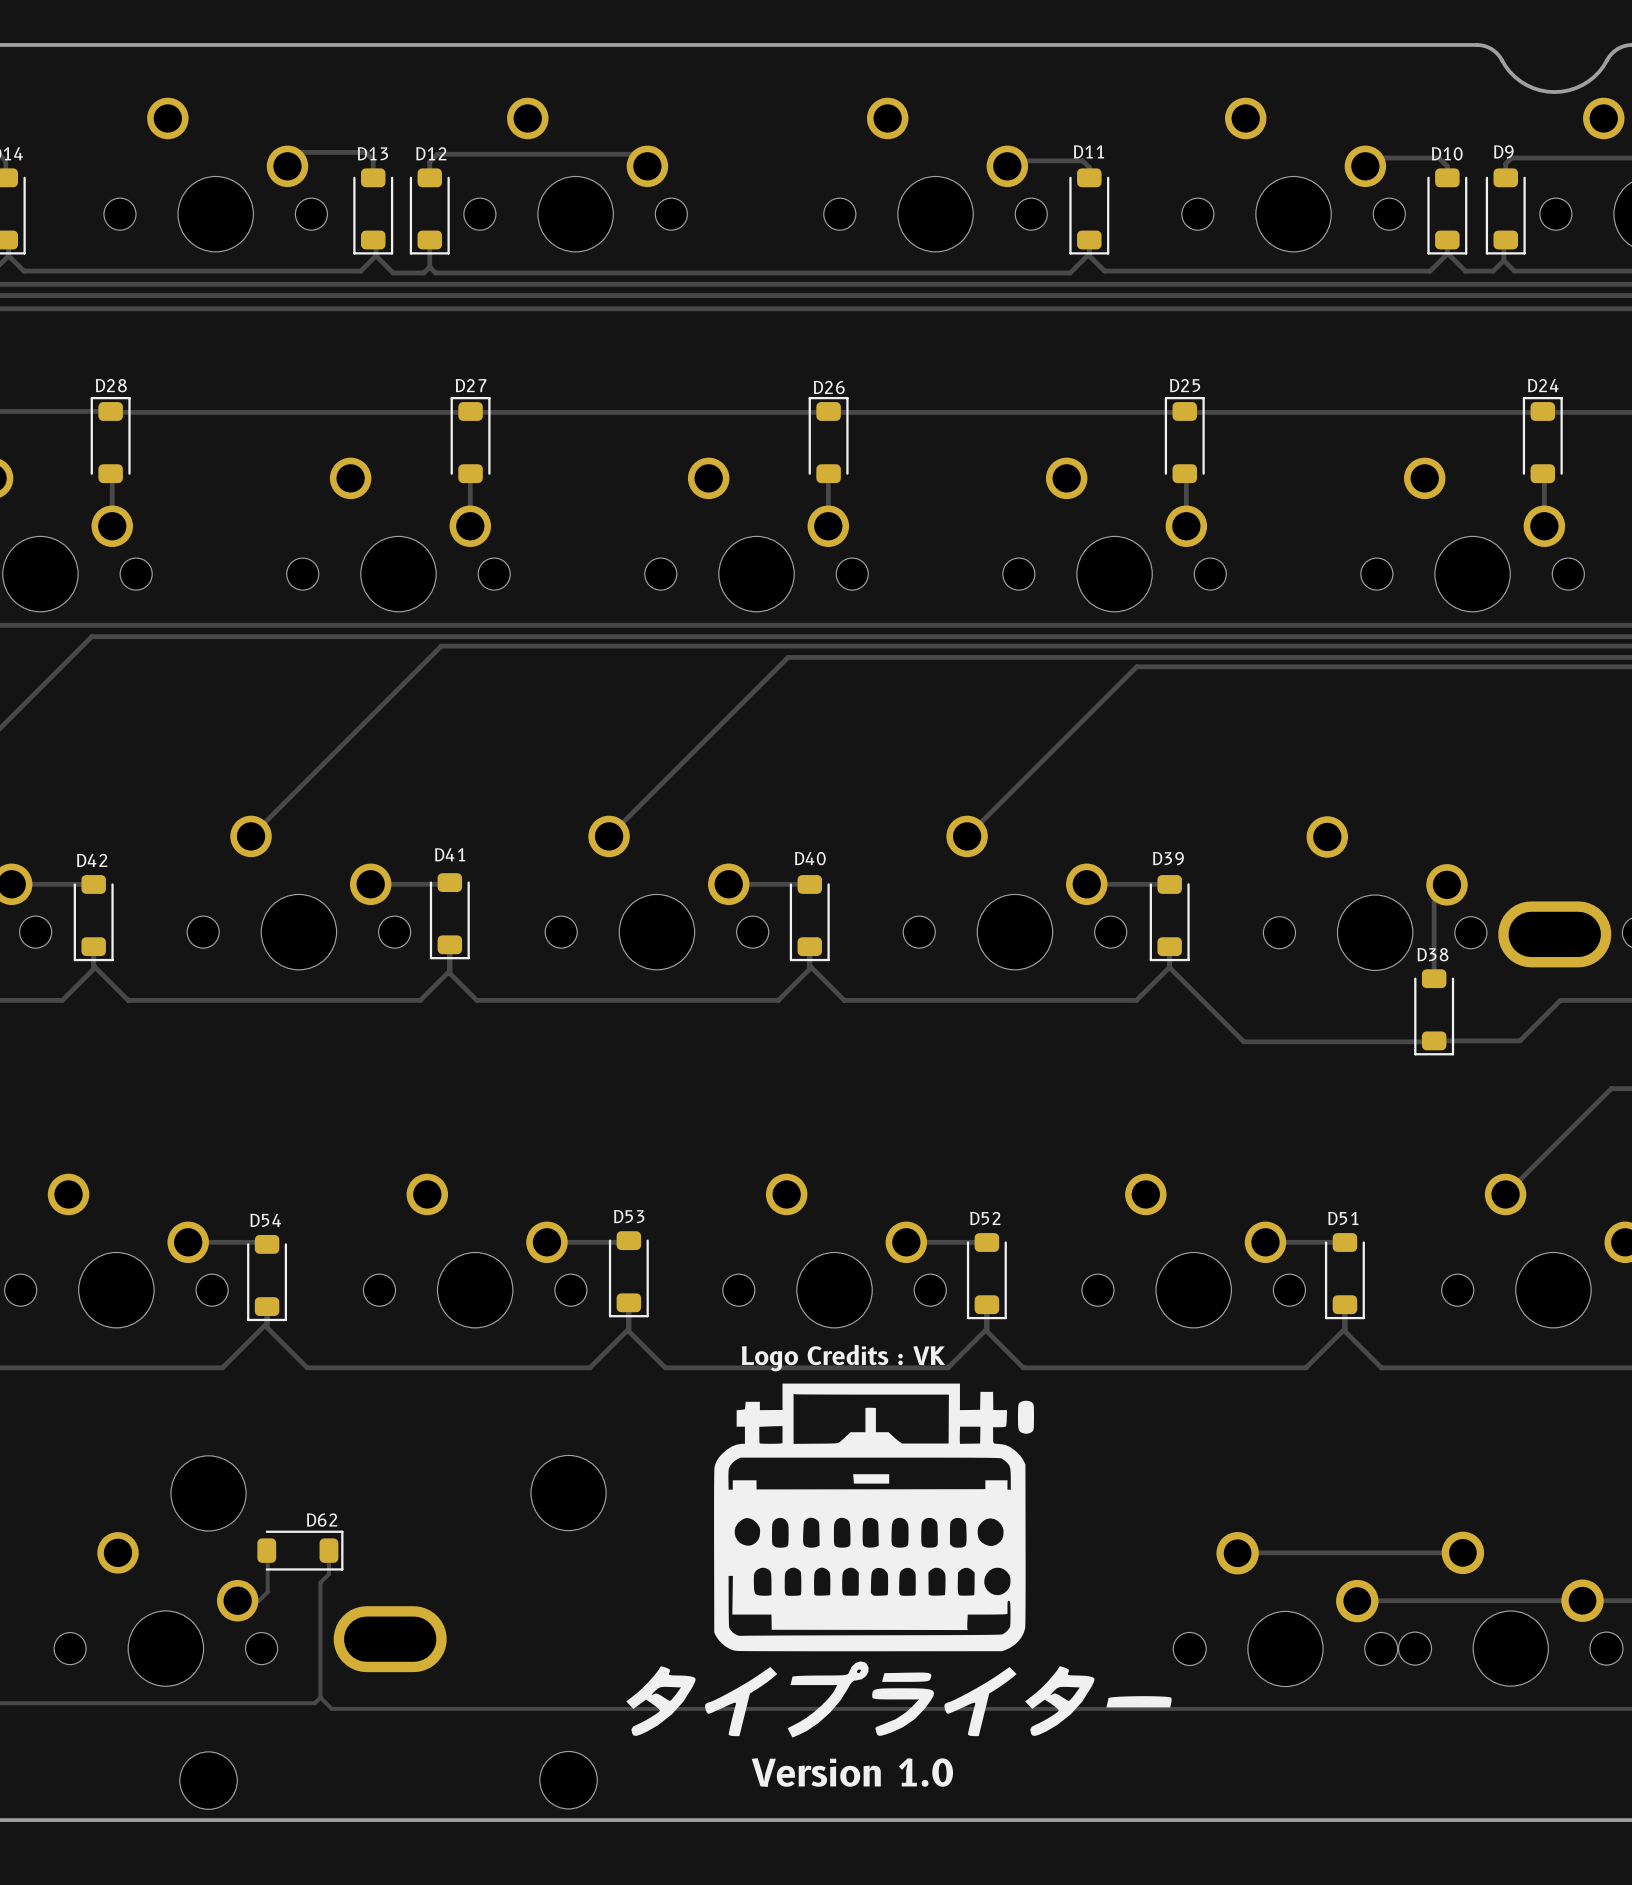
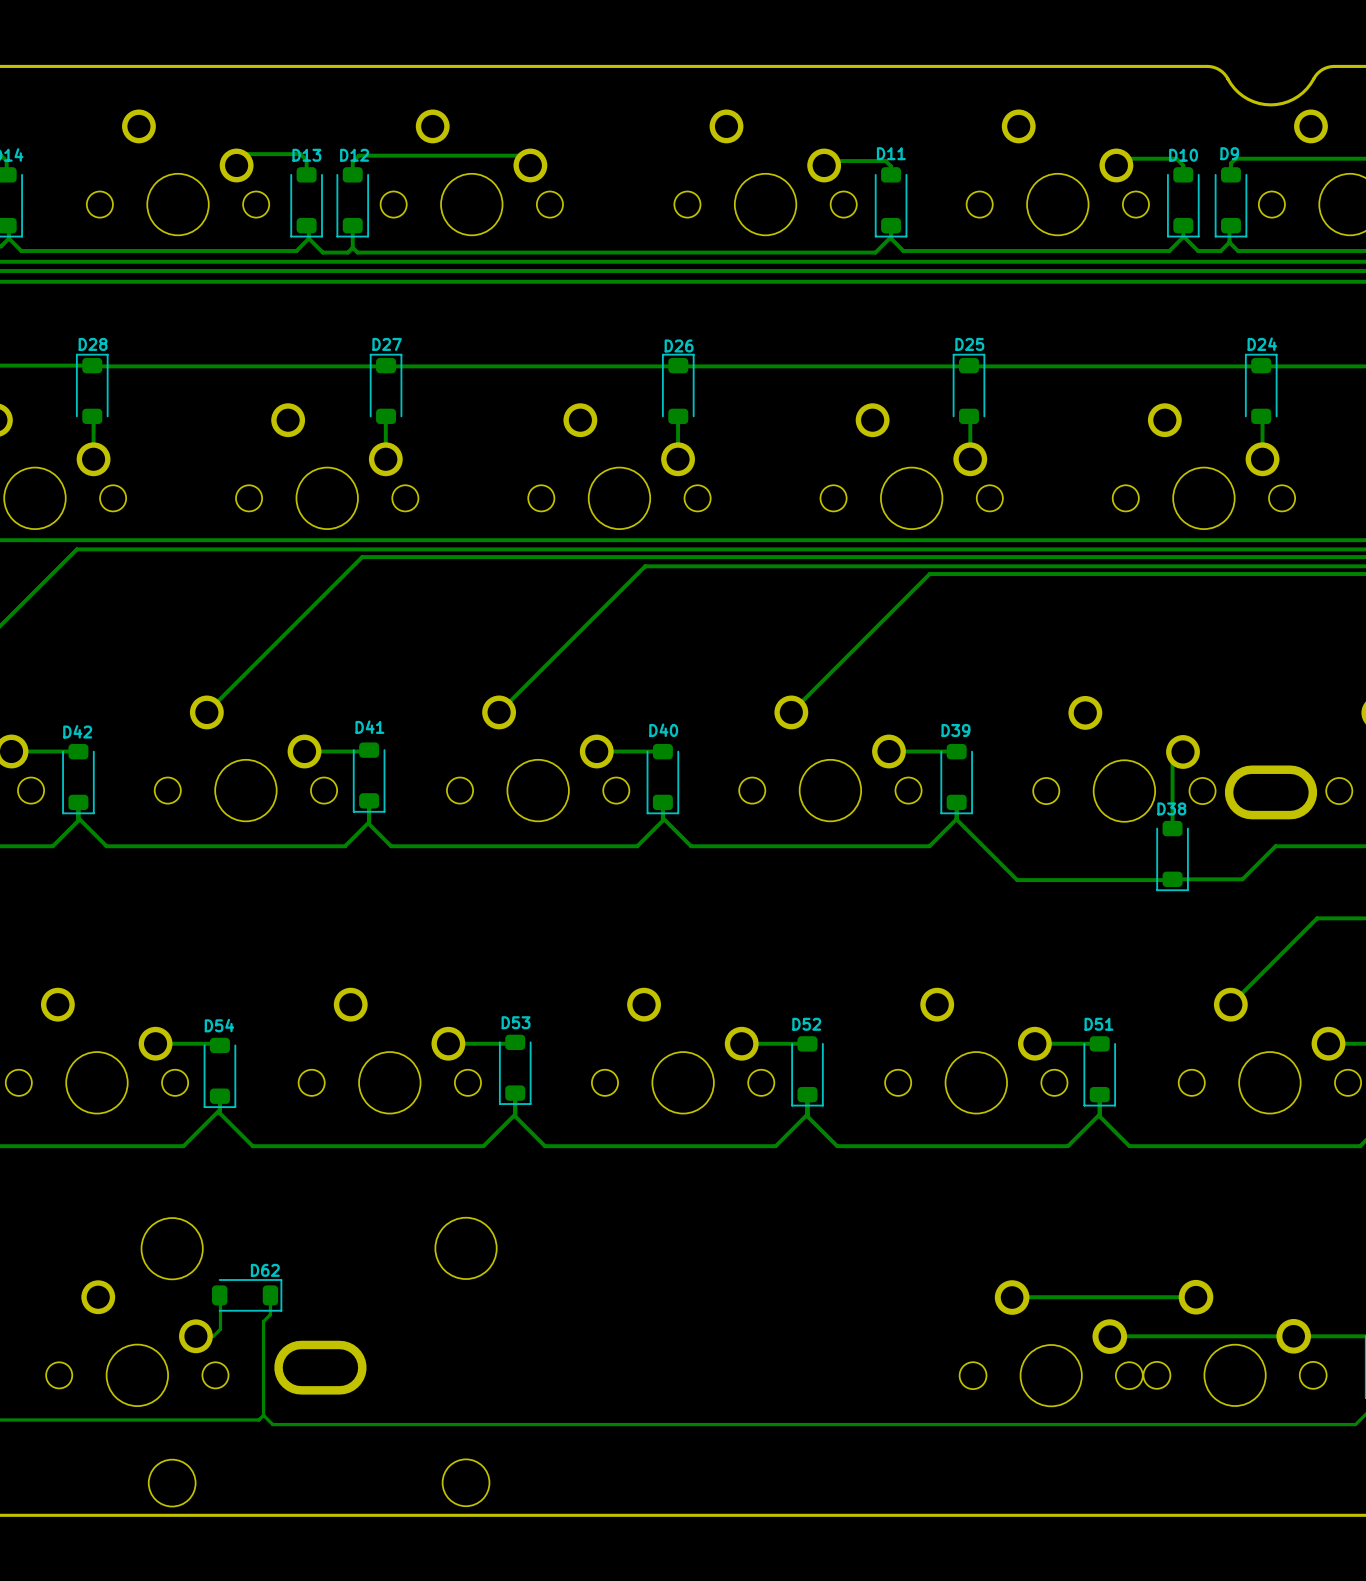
text: Logo Credits : VK (843, 1358) -> none
drawing: [626, 1383, 1172, 1738] -> none
text: Version 1.0 (852, 1772) -> none

